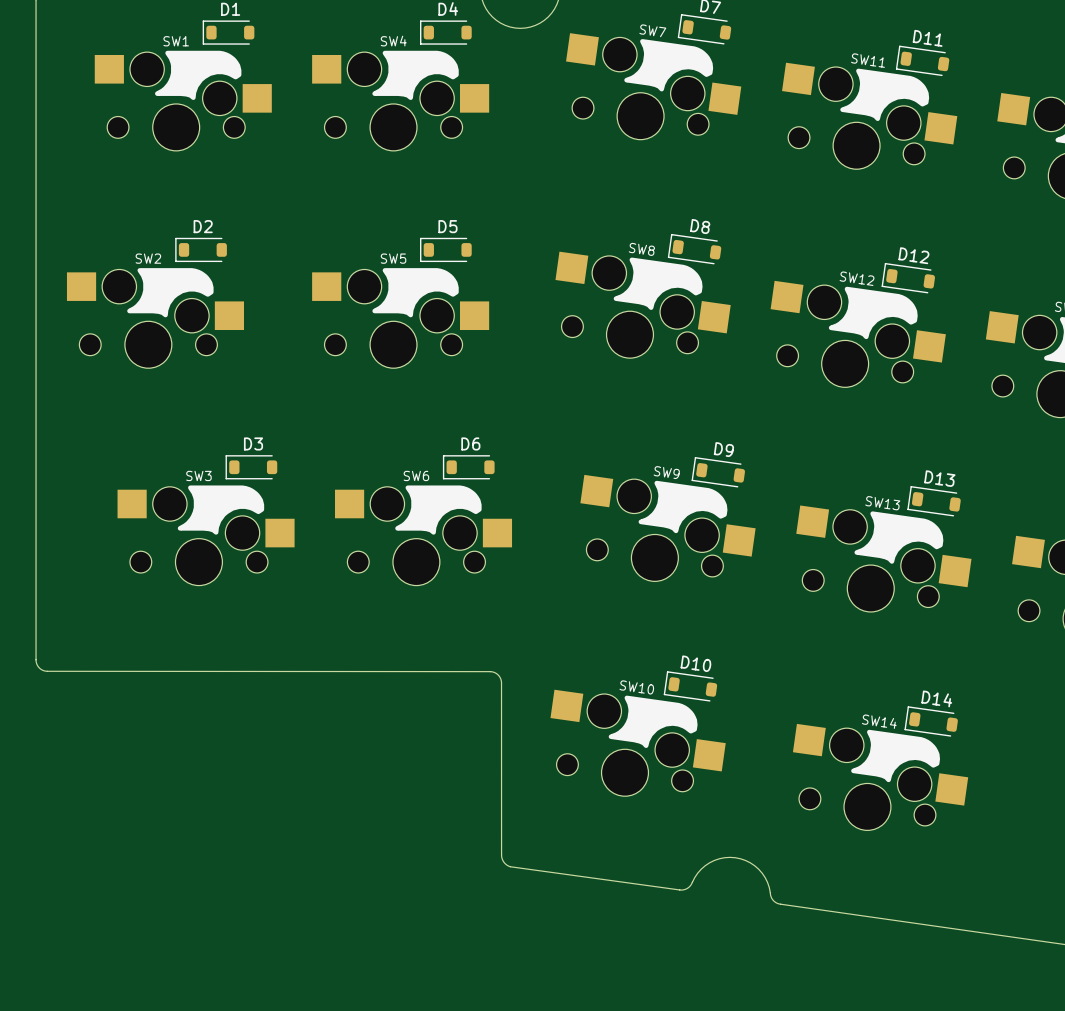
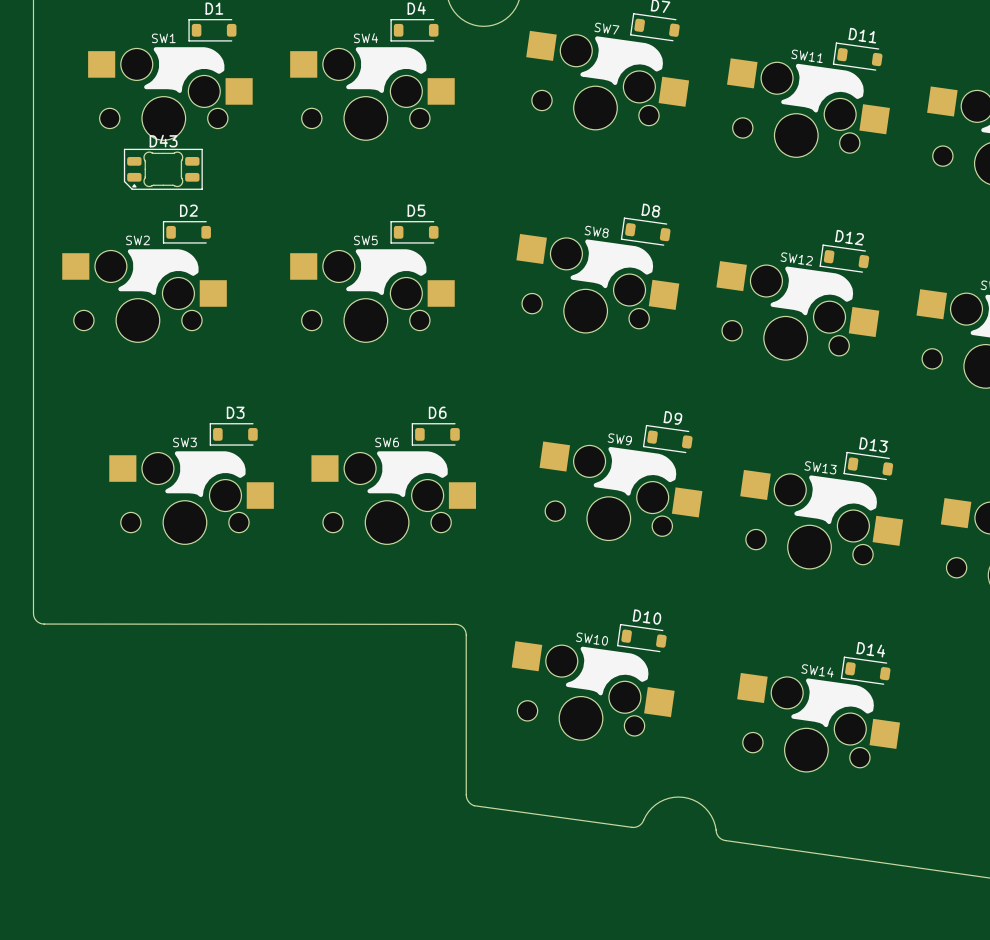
D43: none -> (163, 169)

